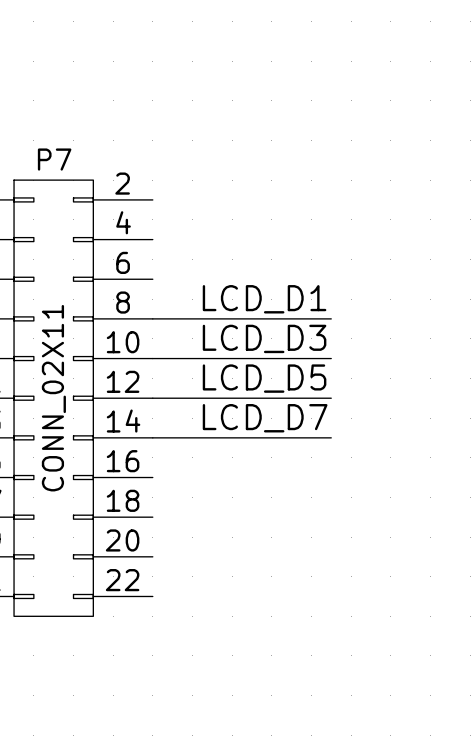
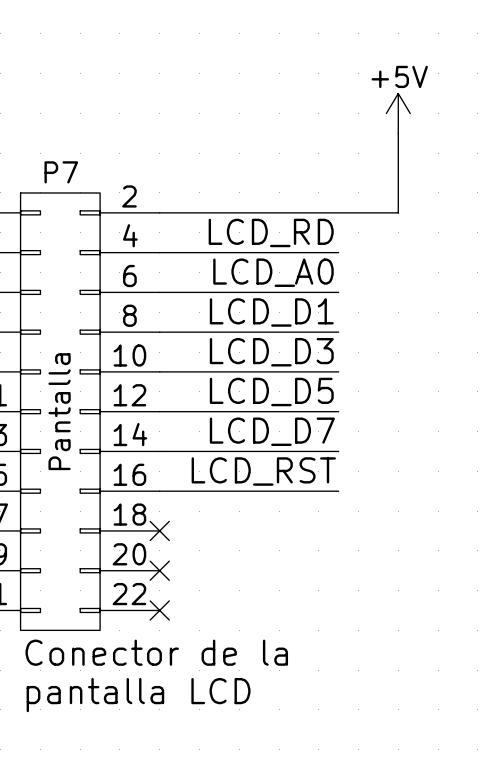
power symbol: none -> +5V (398, 113)
wire: none -> (398, 133) (398, 212) (159, 212)
label: none -> LCD_RD (271, 232)
wire: none -> (159, 252) (338, 252)
label: none -> LCD_A0 (273, 272)
wire: none -> (159, 292) (338, 292)
P7 value: CONN_02X11 (53, 398) -> Pantalla (59, 411)
label: none -> LCD_RST (263, 471)
wire: none -> (159, 491) (338, 491)
no-connect mark: none -> (159, 530)
no-connect mark: none -> (159, 570)
no-connect mark: none -> (159, 610)
text: none -> Conector de la (156, 652)
text: none -> pantalla LCD (138, 695)

